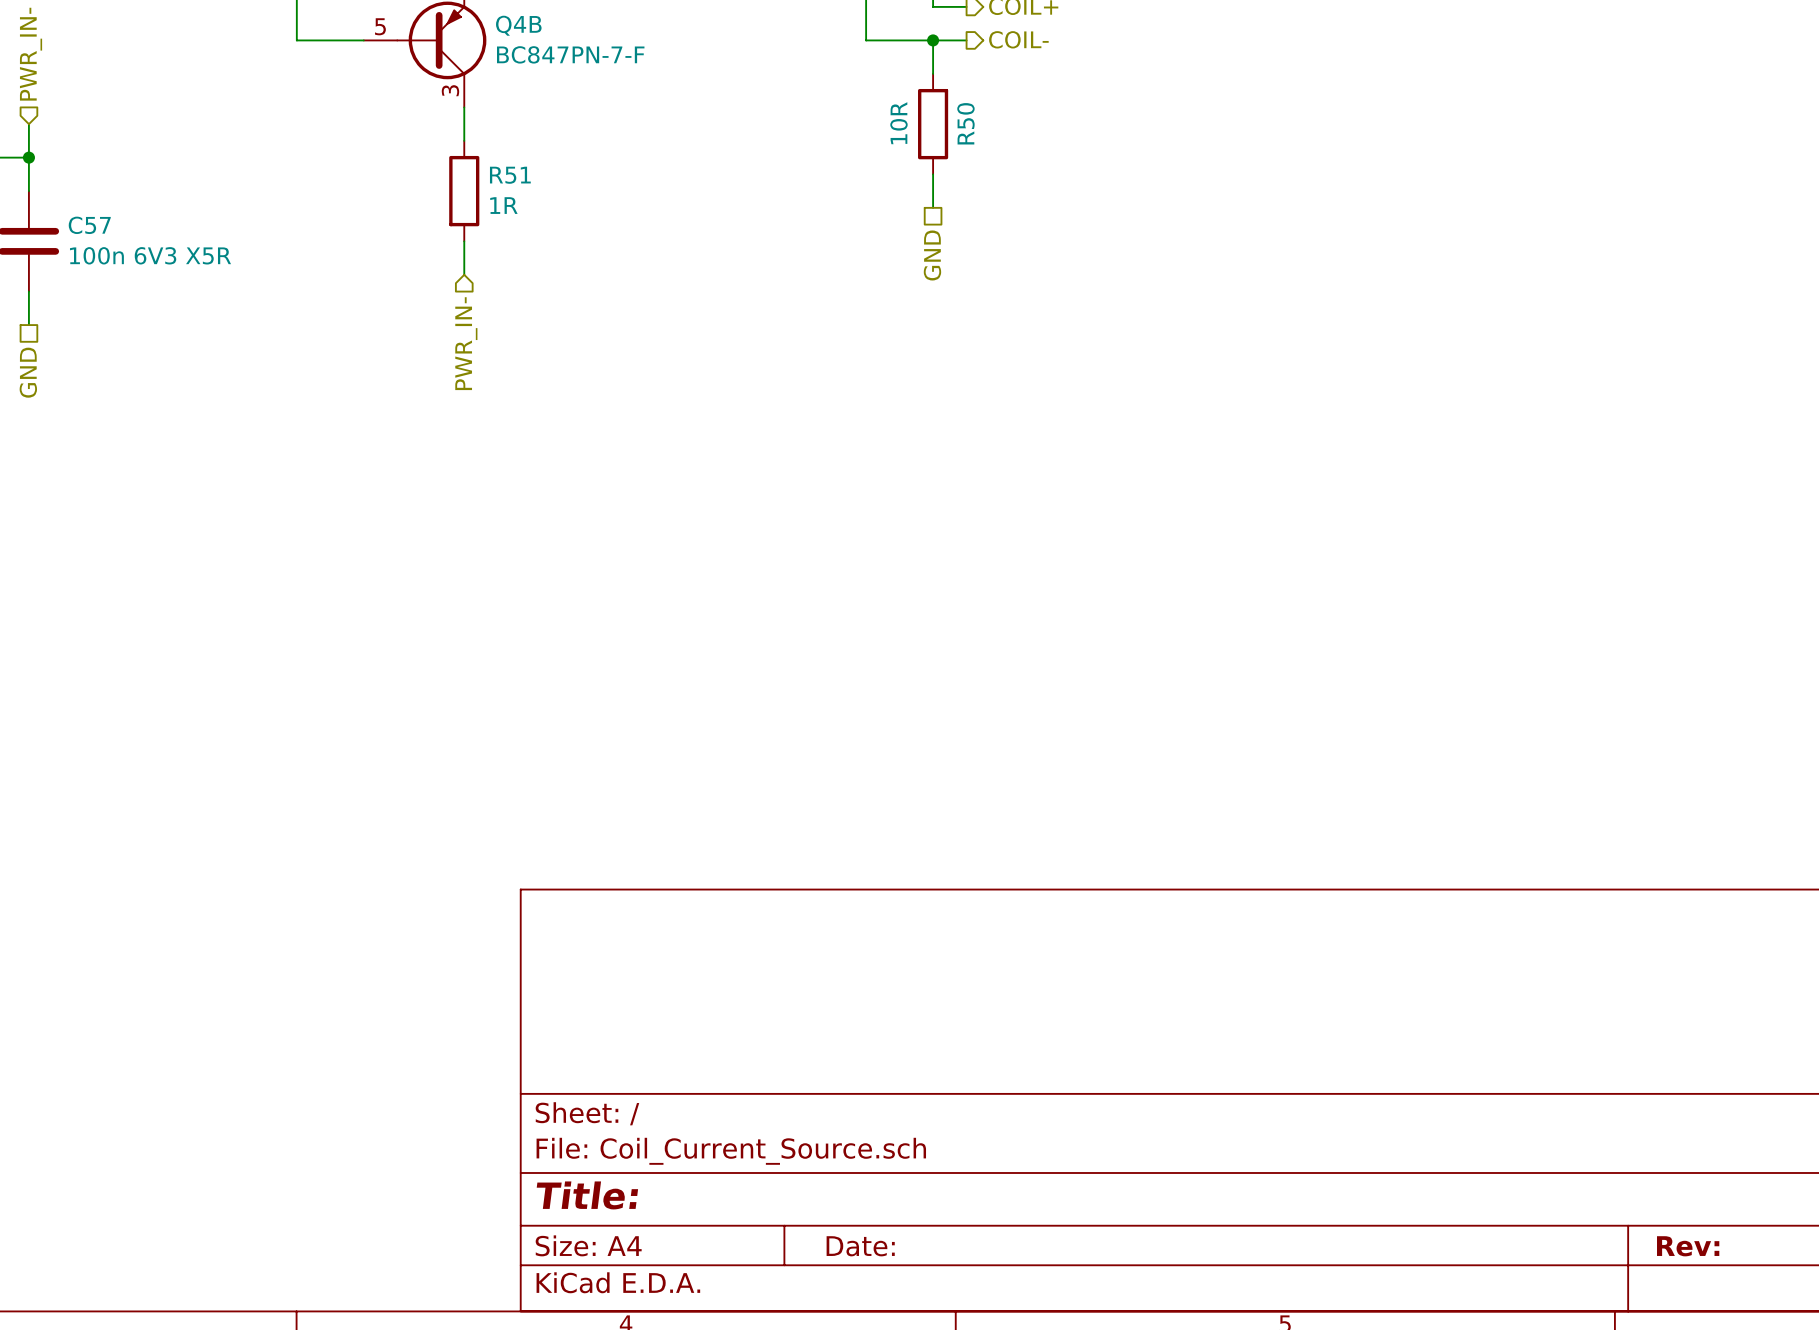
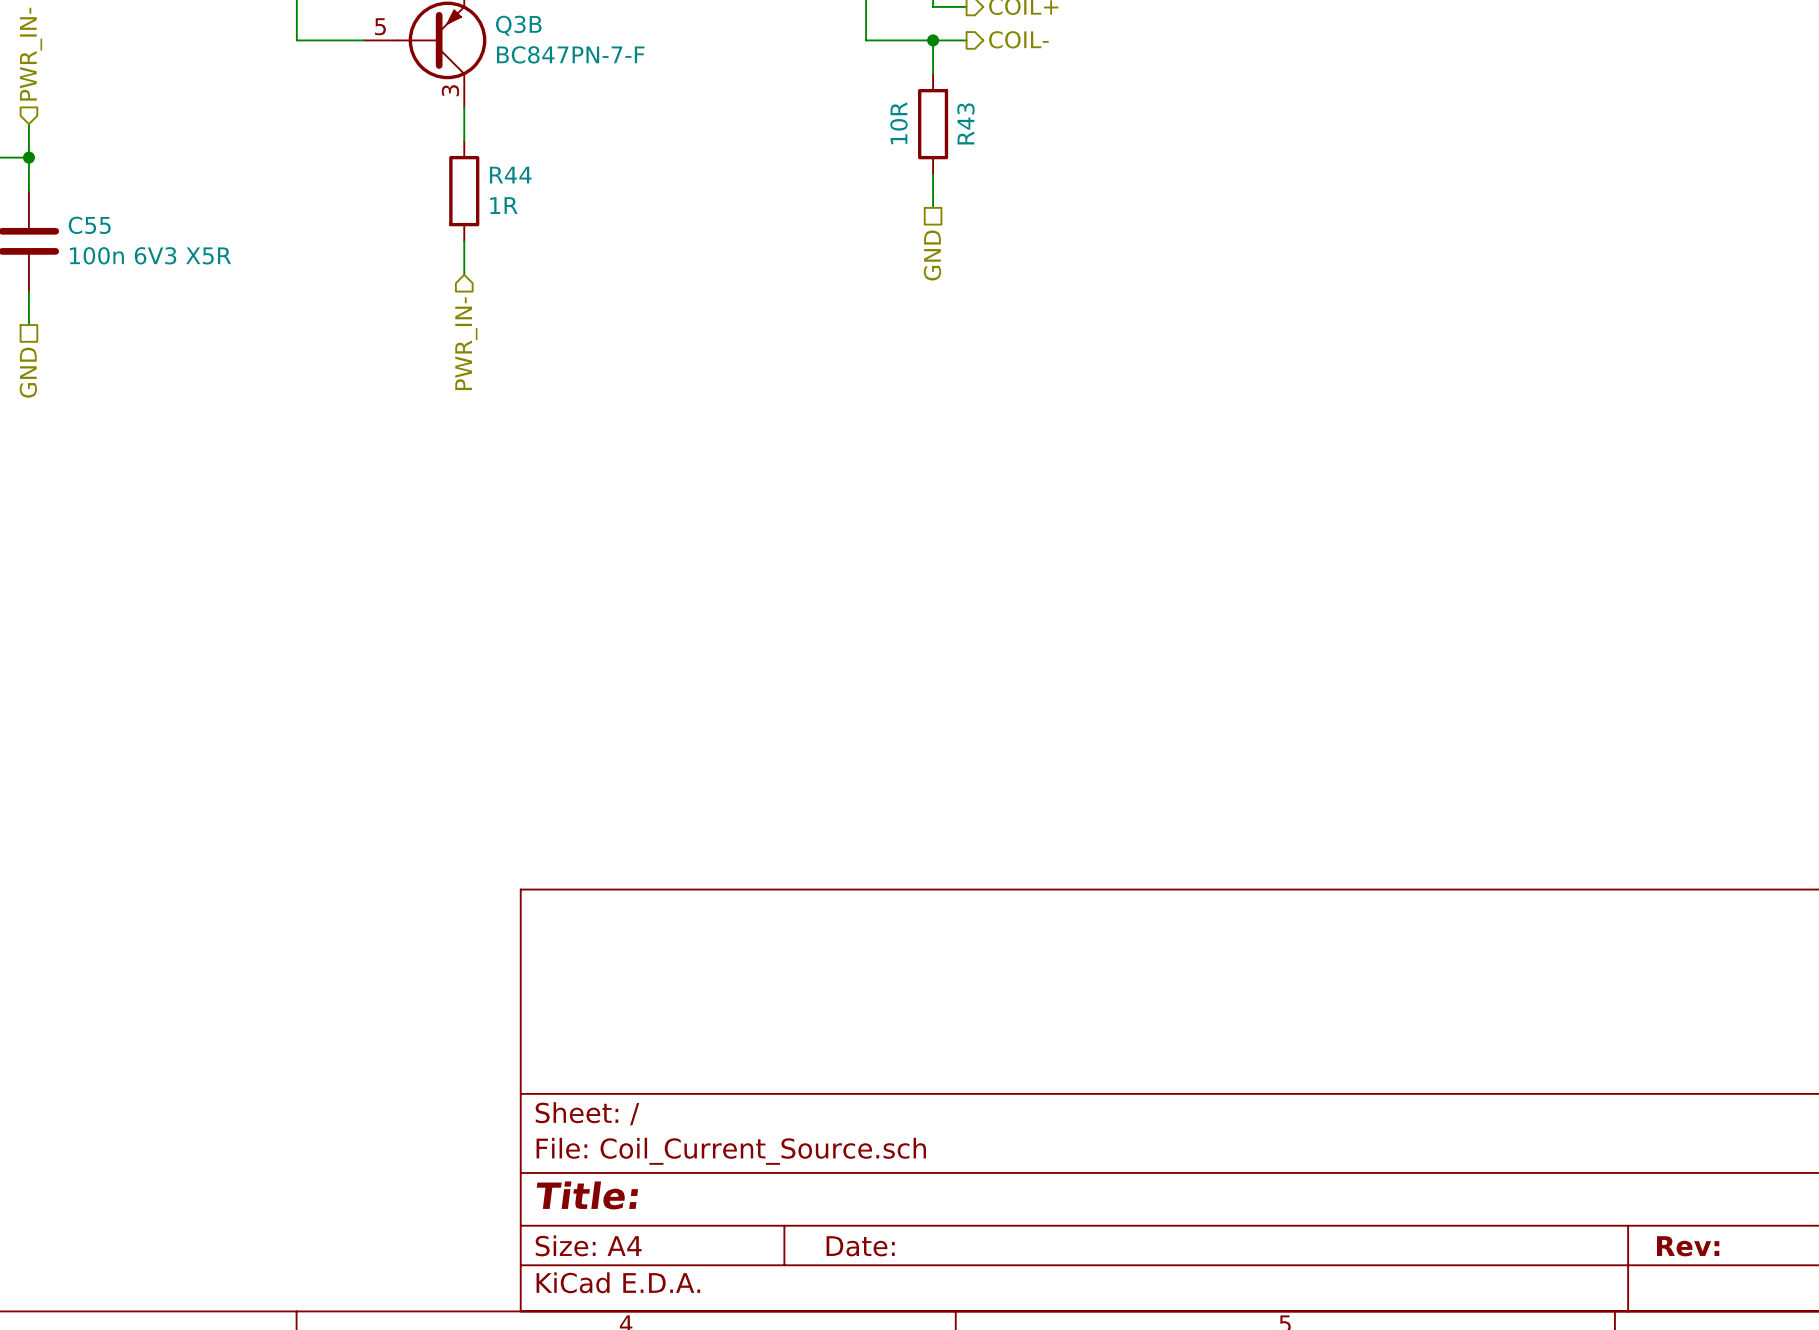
Q4B name: Q4B (518, 25) -> Q3B (518, 25)
R50 name: R50 (965, 123) -> R43 (965, 123)
R51 name: R51 (510, 175) -> R44 (510, 175)
C57 name: C57 (89, 225) -> C55 (89, 225)

